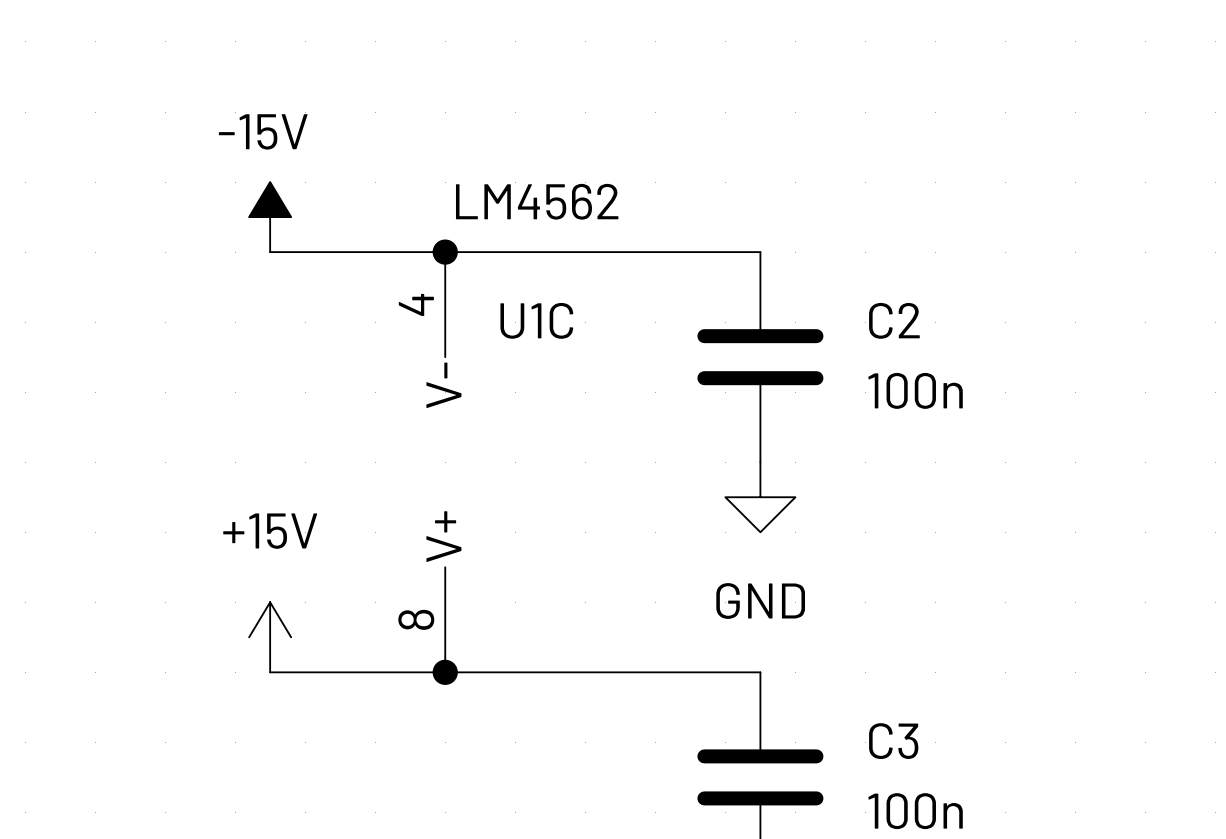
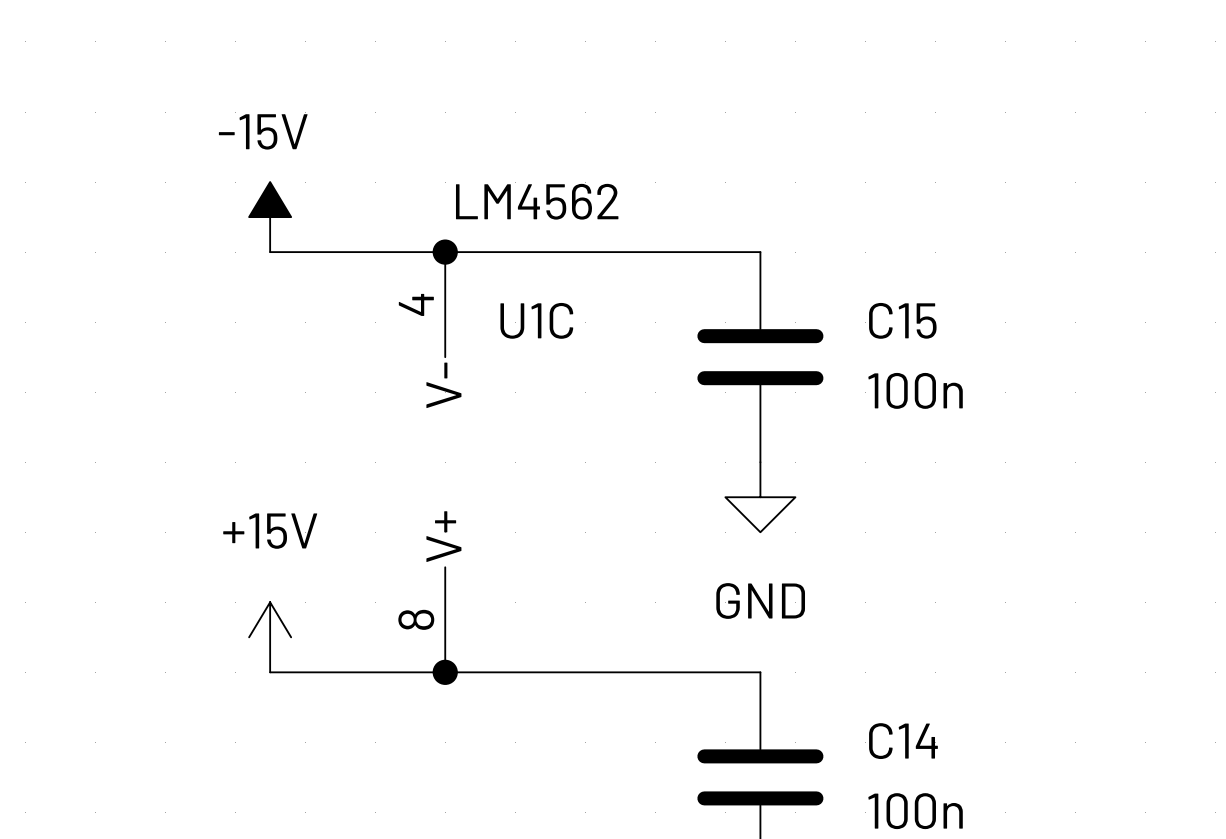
C2 name: C2 (894, 320) -> C15 (902, 320)
C3 name: C3 (893, 741) -> C14 (903, 741)

